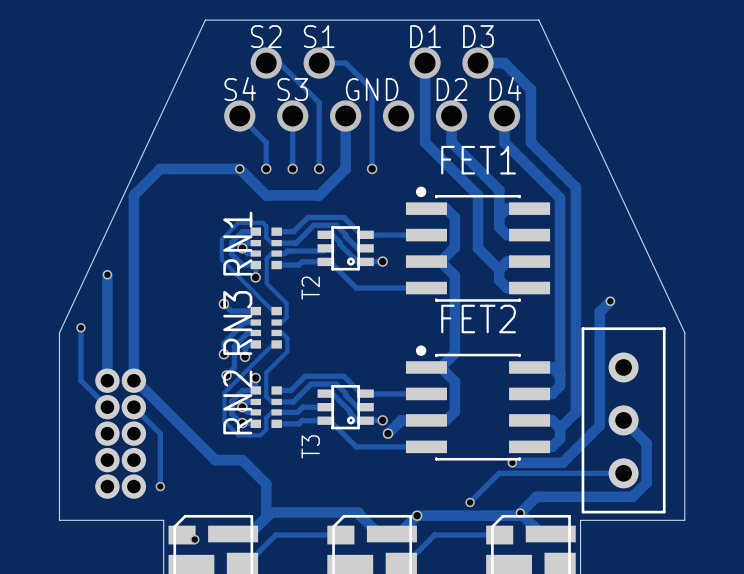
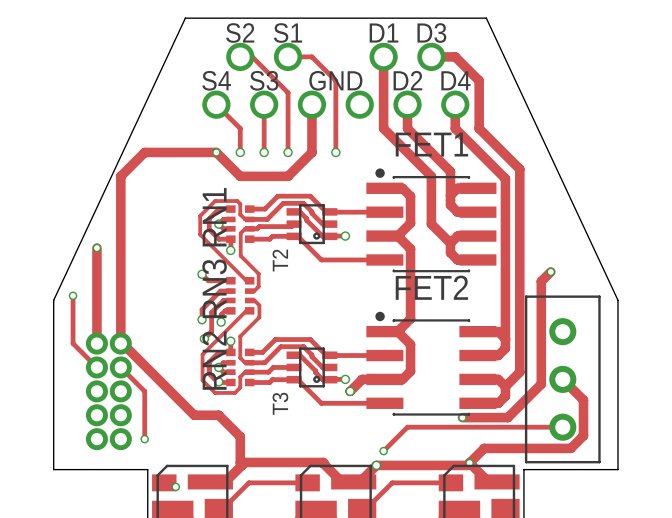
track: (499, 473) (470, 502) -> (450, 427) (407, 427) (383, 451)
via position: (470, 502) -> (383, 451)

